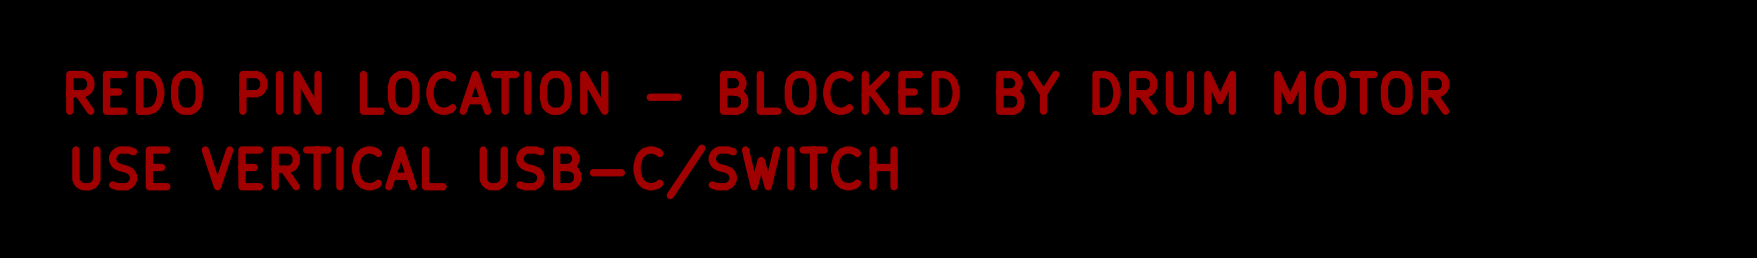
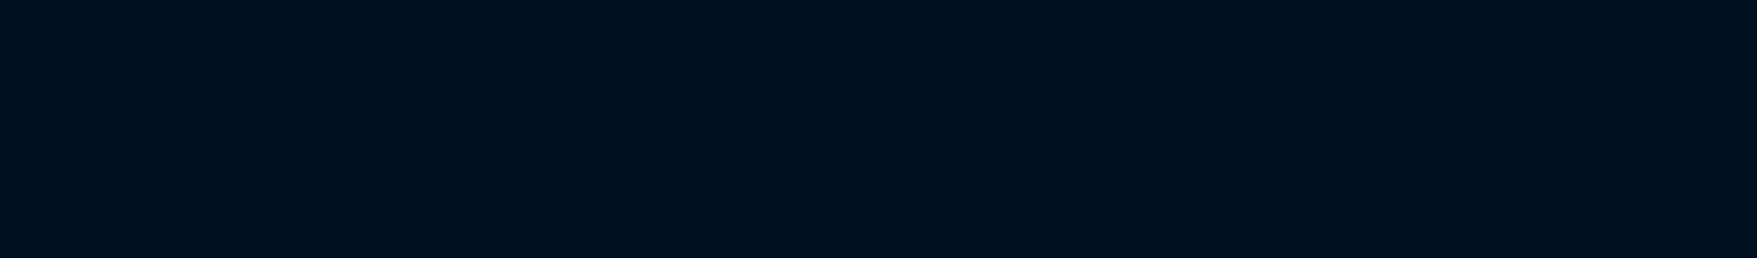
text: REDO PIN LOCATION - BLOCKED BY DRUM MOTOR (757, 92) -> none
text: USE VERTICAL USB-C/SWITCH (485, 171) -> none

